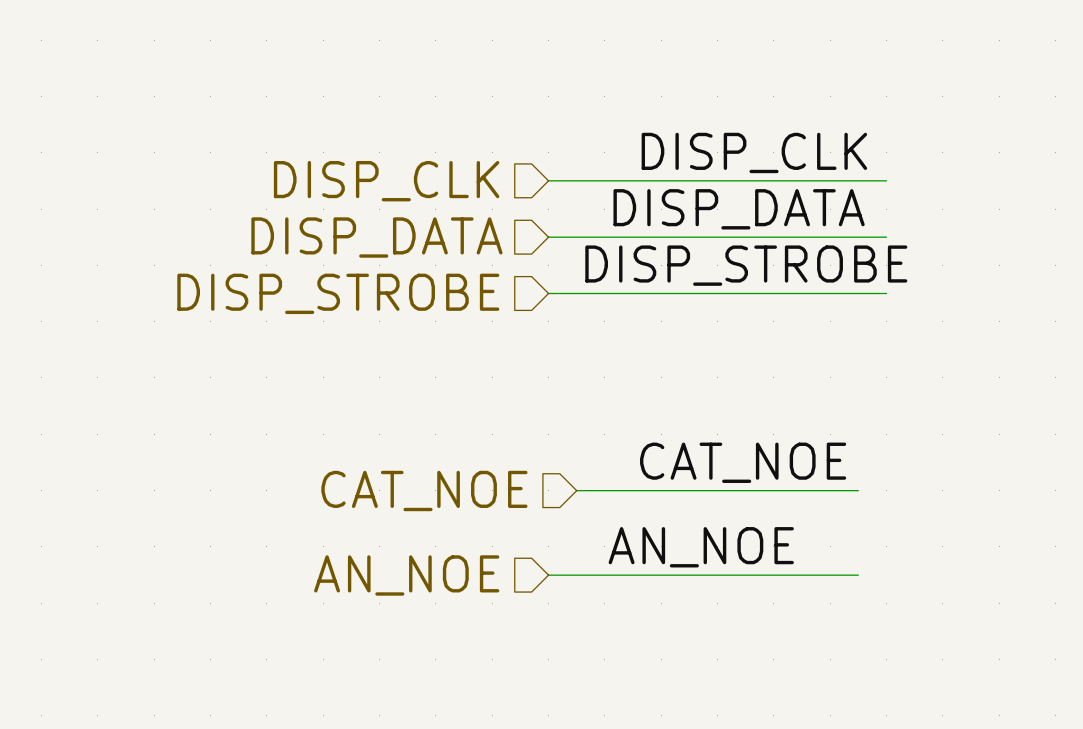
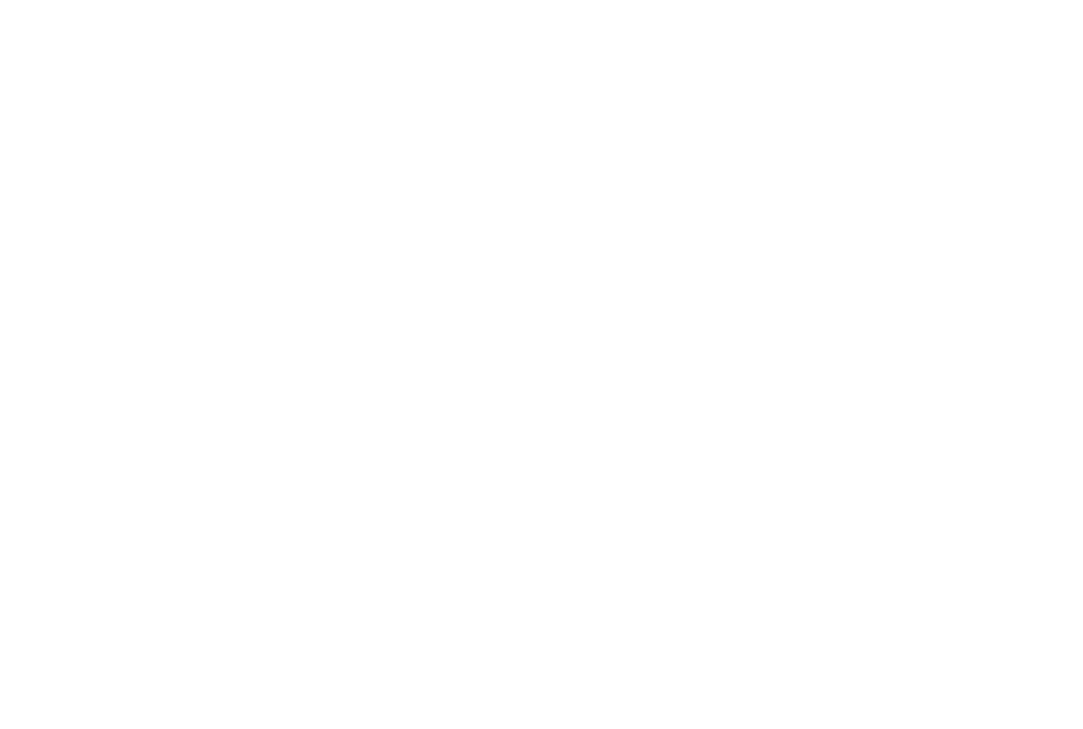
label: DISP_CLK (754, 152) -> none
wire: (548, 180) (886, 180) -> none
hierarchical label: DISP_CLK (386, 181) -> none
label: DISP_DATA (739, 209) -> none
hierarchical label: DISP_DATA (376, 237) -> none
wire: (548, 237) (886, 237) -> none
label: DISP_STROBE (746, 265) -> none
hierarchical label: DISP_STROBE (338, 293) -> none
wire: (548, 293) (886, 293) -> none
label: CAT_NOE (743, 462) -> none
wire: (576, 490) (858, 490) -> none
hierarchical label: CAT_NOE (424, 491) -> none
label: AN_NOE (701, 547) -> none
hierarchical label: AN_NOE (406, 575) -> none
wire: (548, 575) (858, 575) -> none

